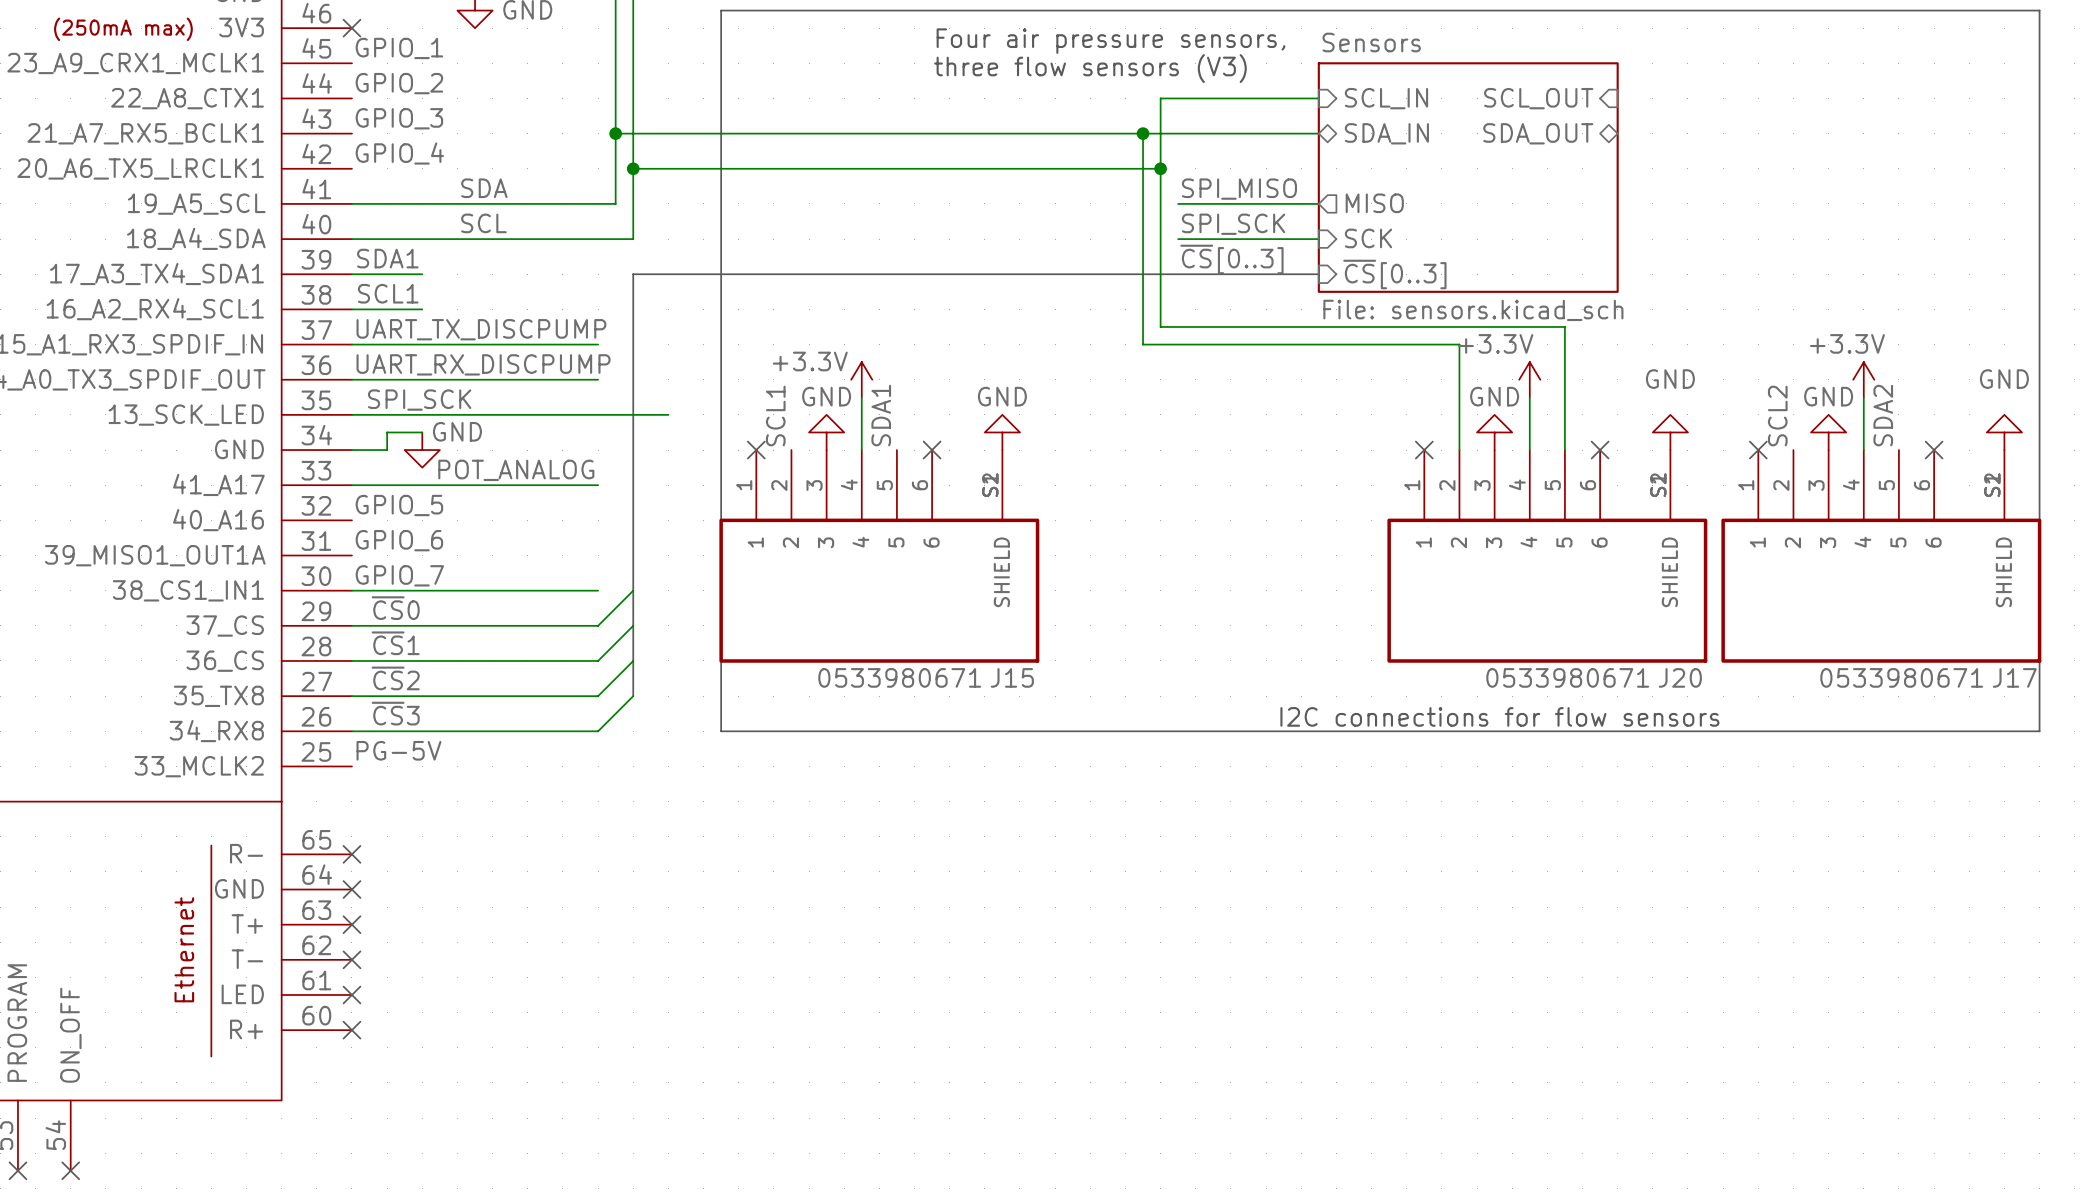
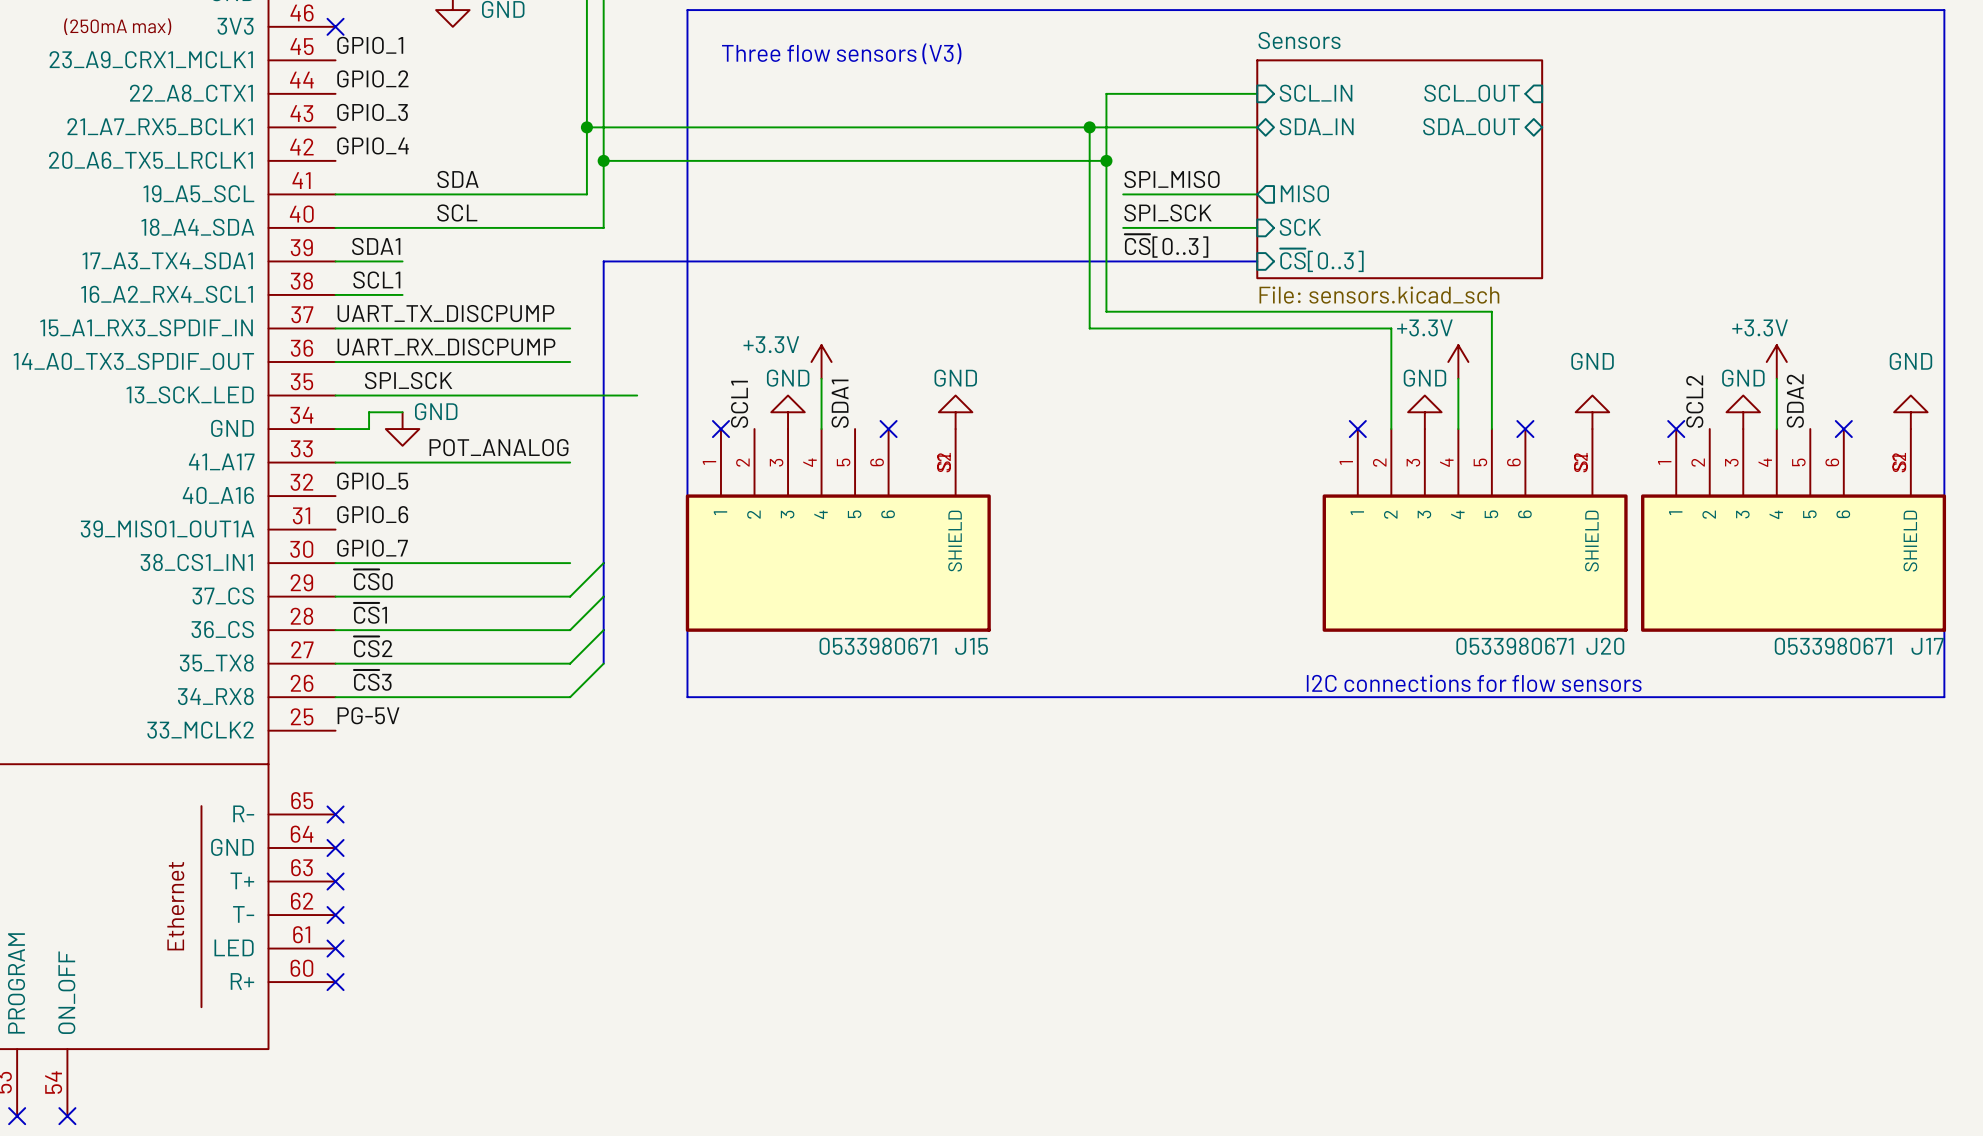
text: Four air pressure sensors, (1110, 41) -> none
text: three flow sensors (V3) (1090, 68) -> Three flow sensors (V3) (841, 53)

